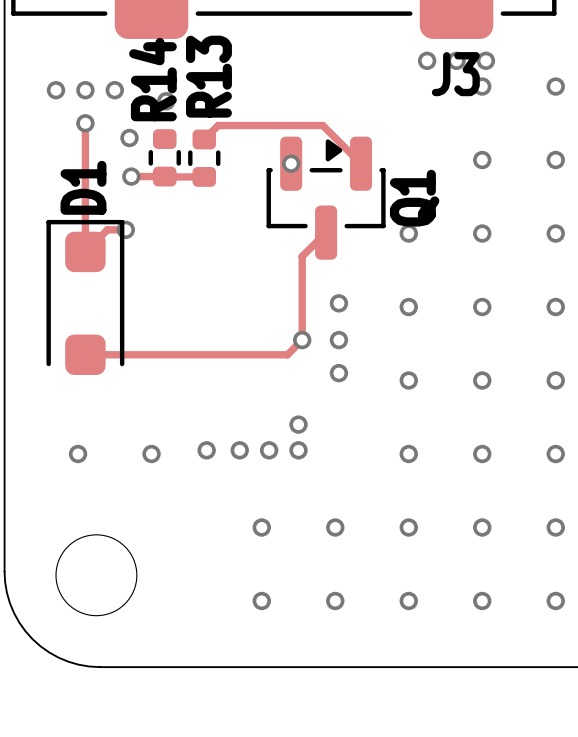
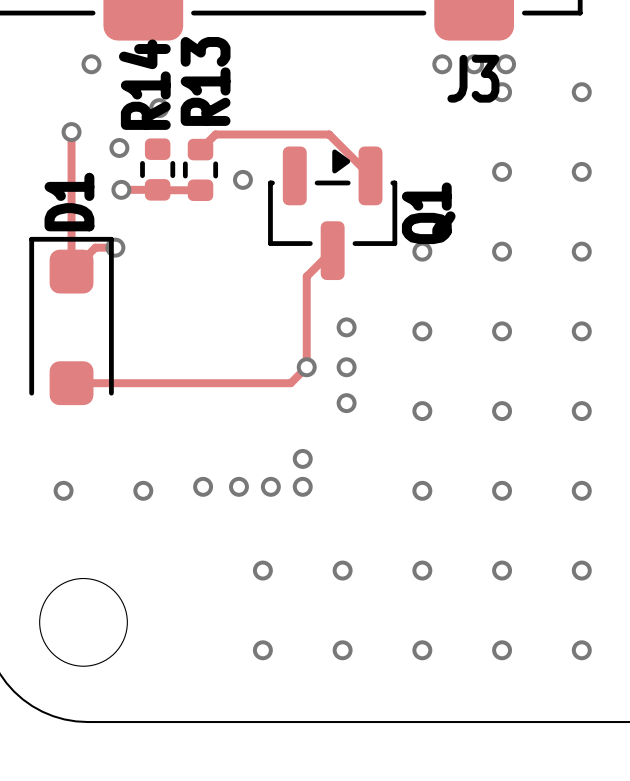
via: none -> (91, 64)
via: (56, 90) -> none
via: (85, 90) -> none
via: (114, 90) -> none
via position: (291, 163) -> (242, 179)

